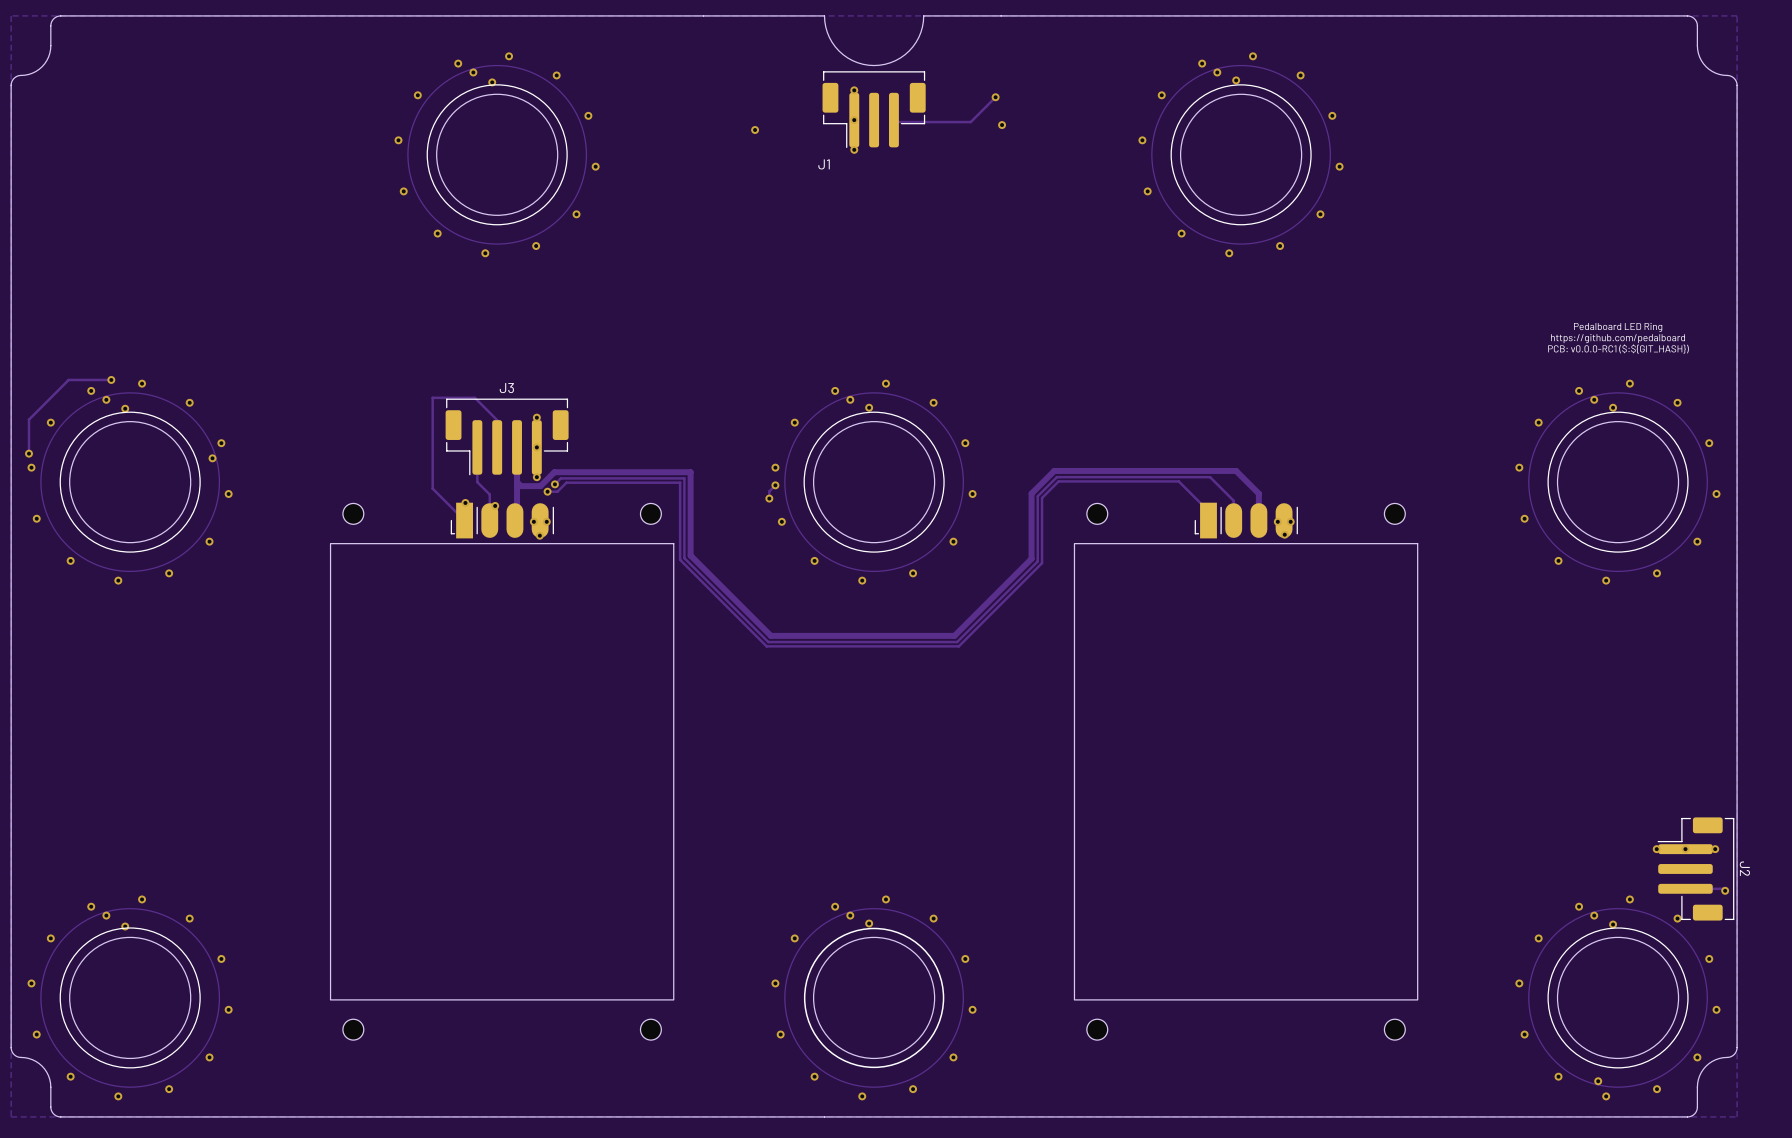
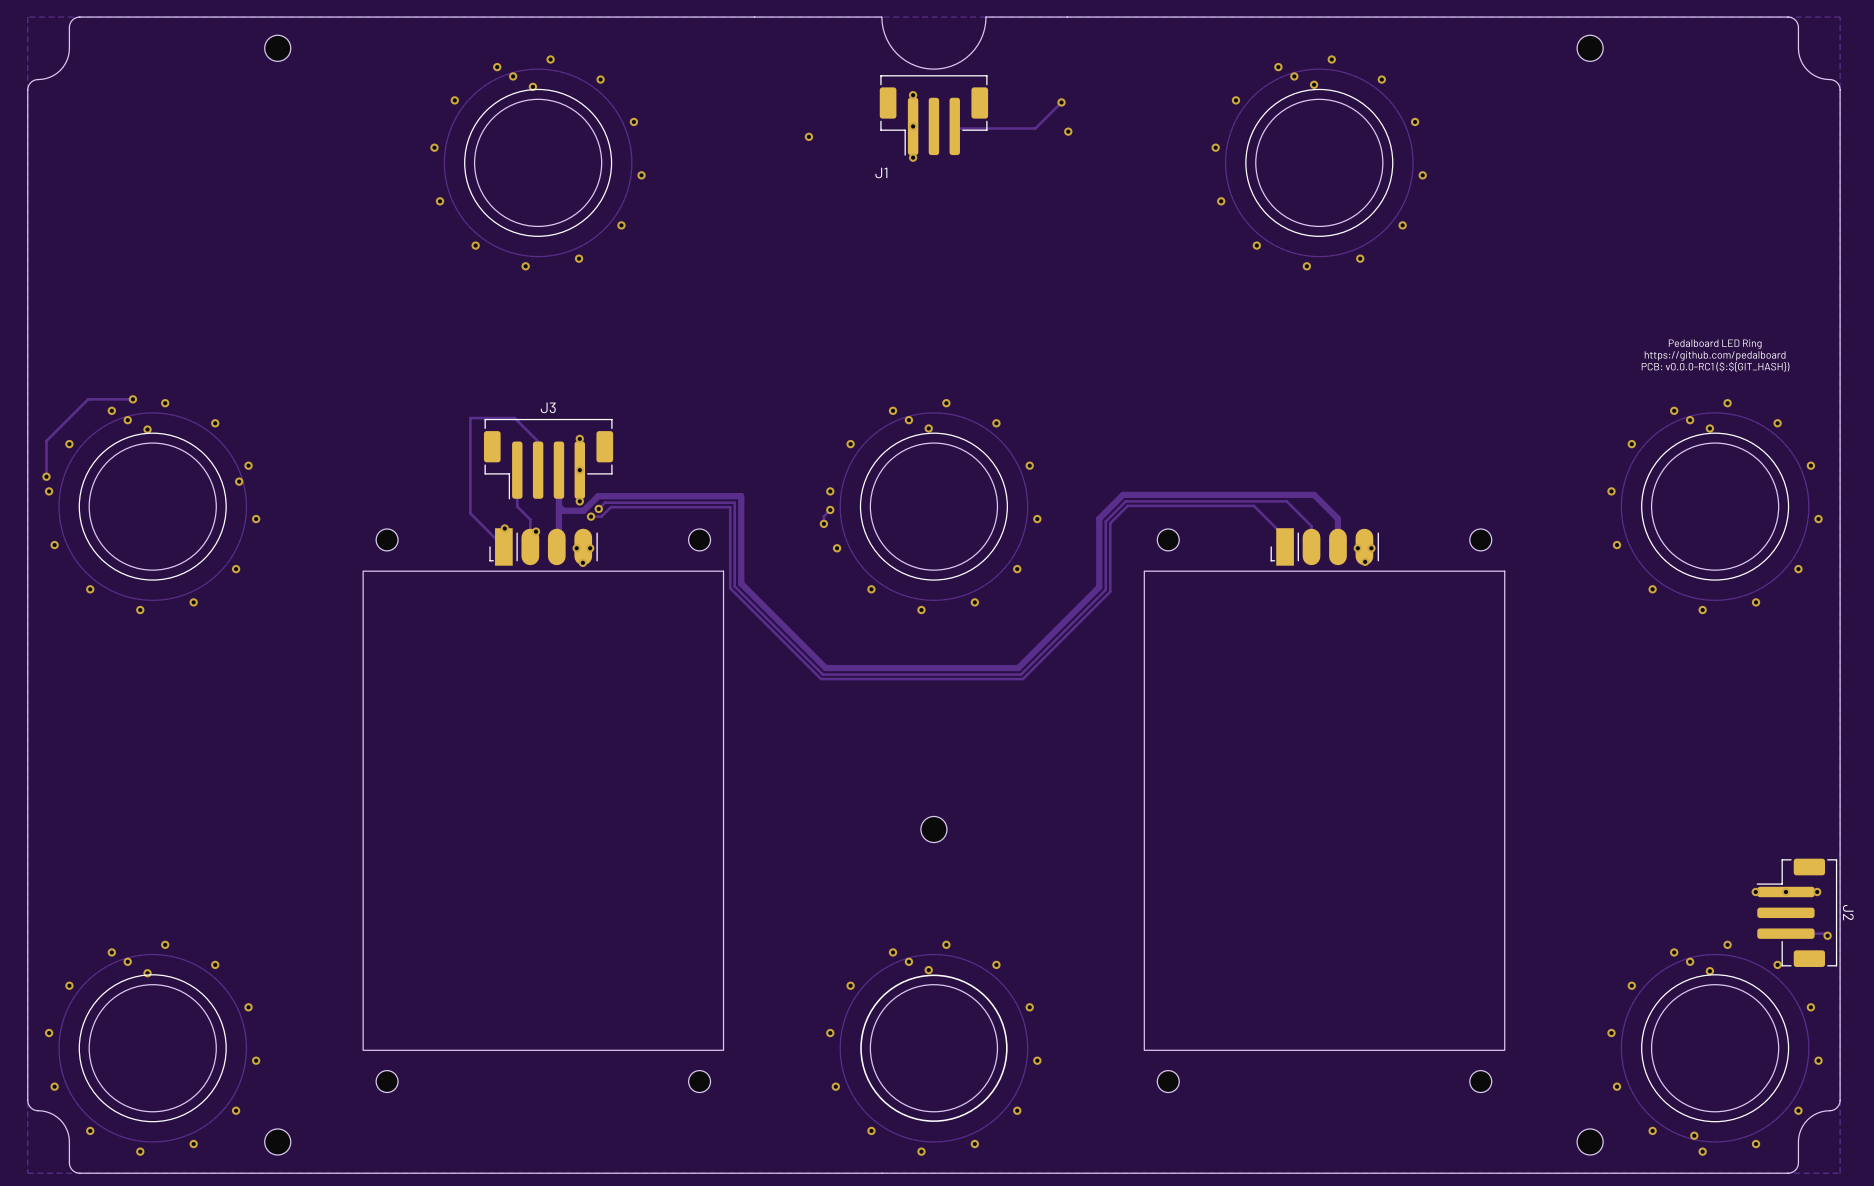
part: none -> (277, 48)
part: none -> (1590, 48)
part: none -> (933, 829)
part: none -> (277, 1141)
part: none -> (1590, 1141)

